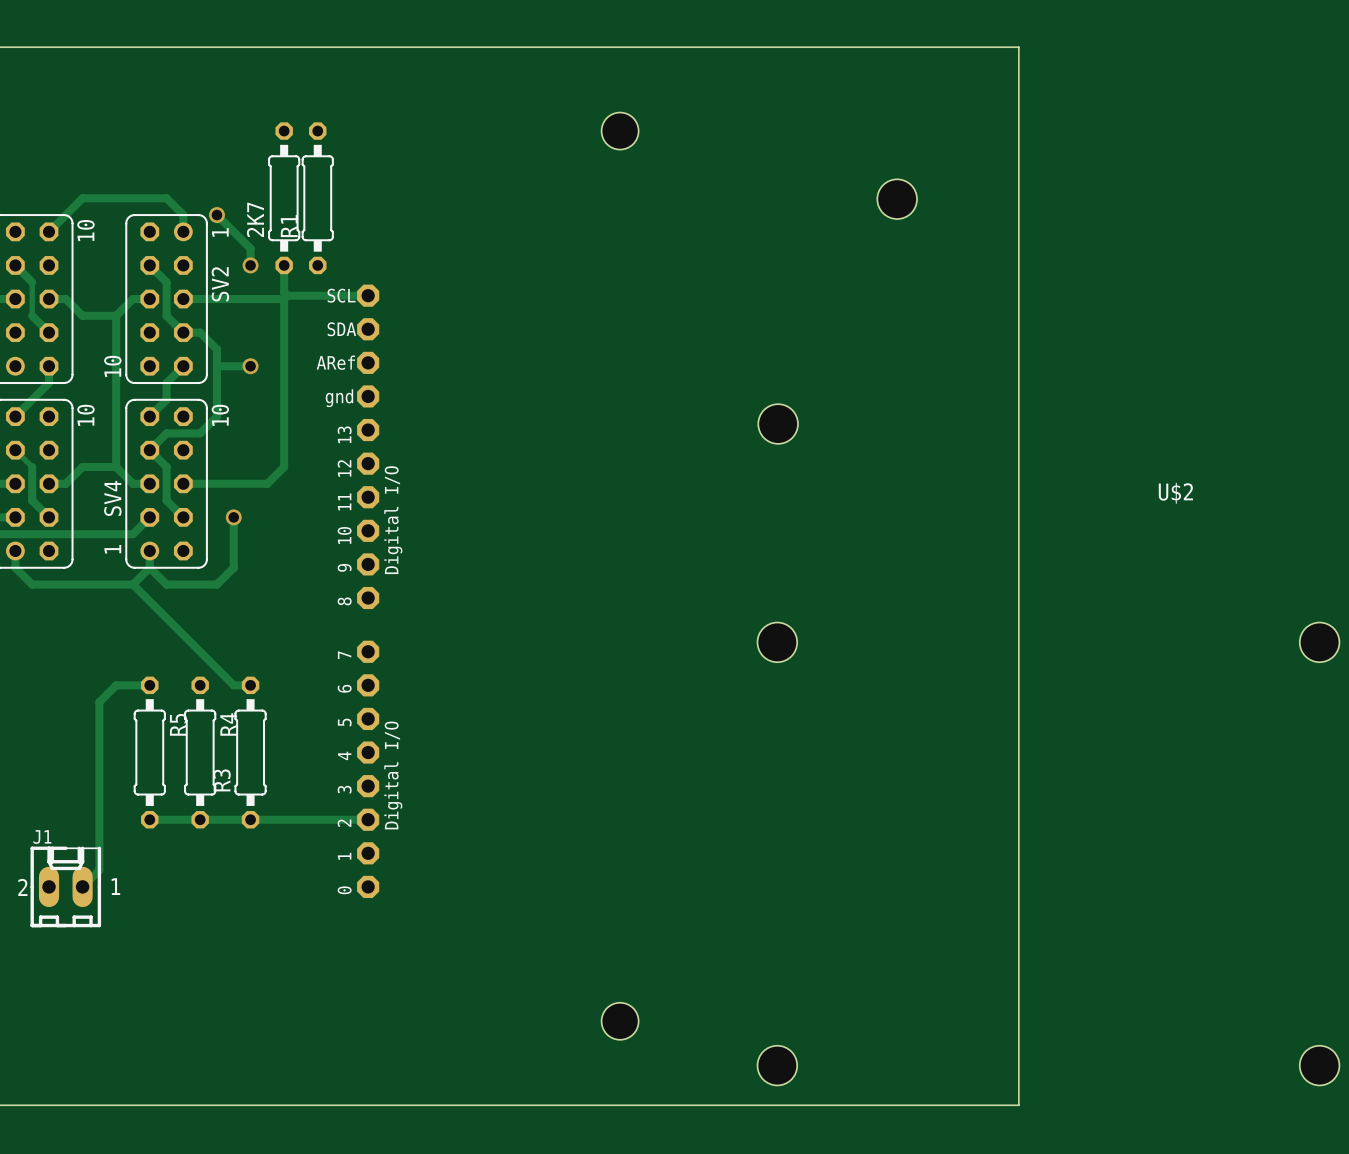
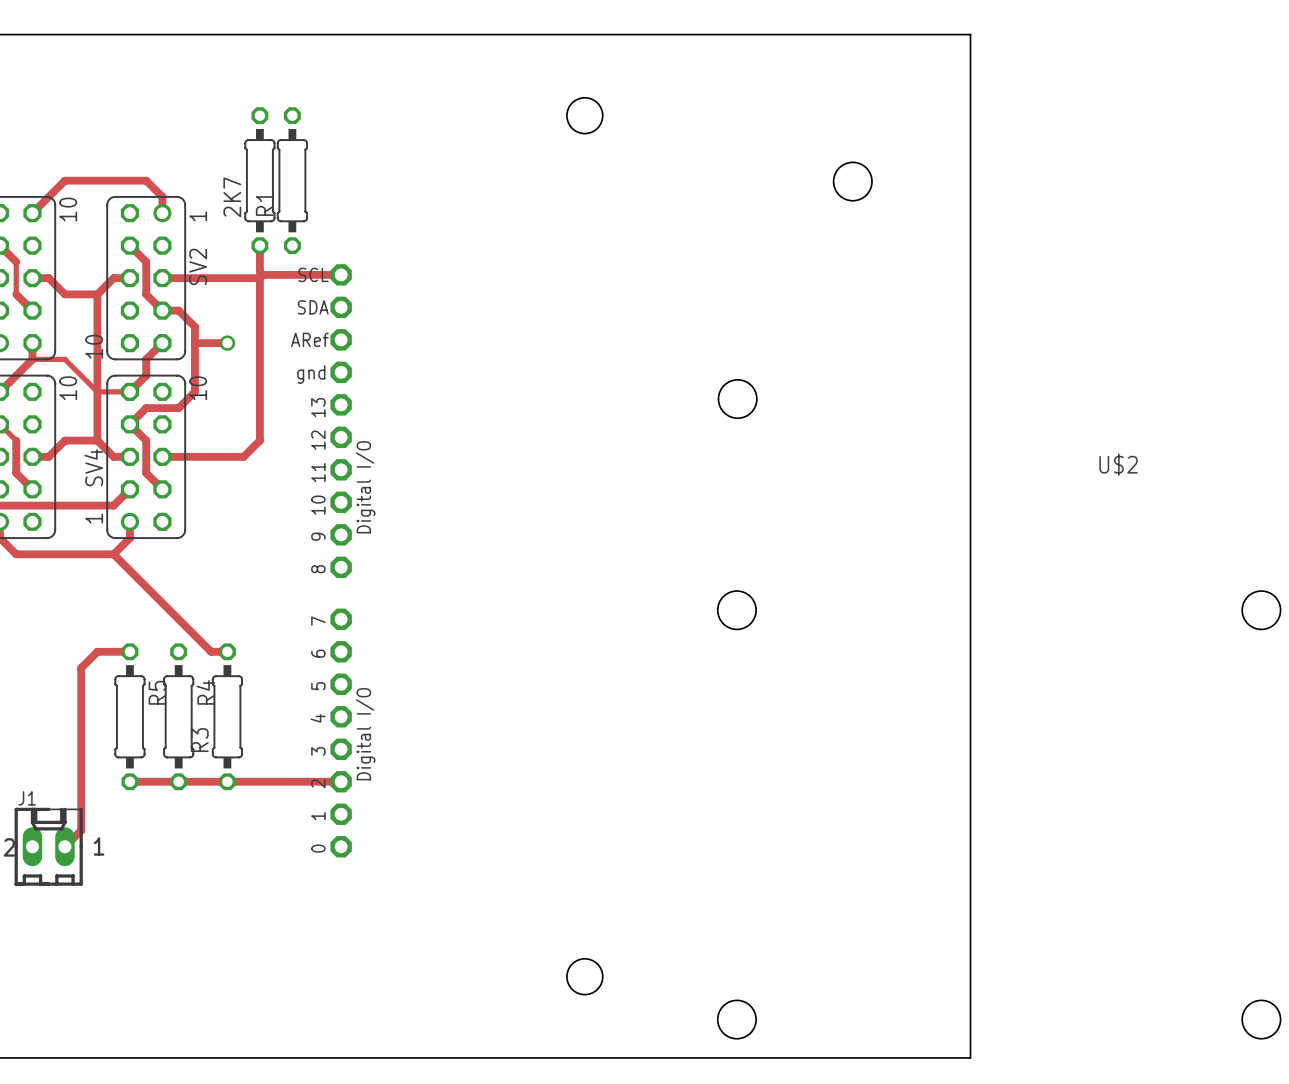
track: (216, 215) (250, 248) (250, 265) -> none
via: (216, 215) -> none
via: (250, 265) -> none
track: none -> (32, 359) (64, 359) (97, 391) (129, 391)
track: (233, 517) (233, 567) (216, 584) (166, 584) (149, 567) -> none
via: (233, 517) -> none

